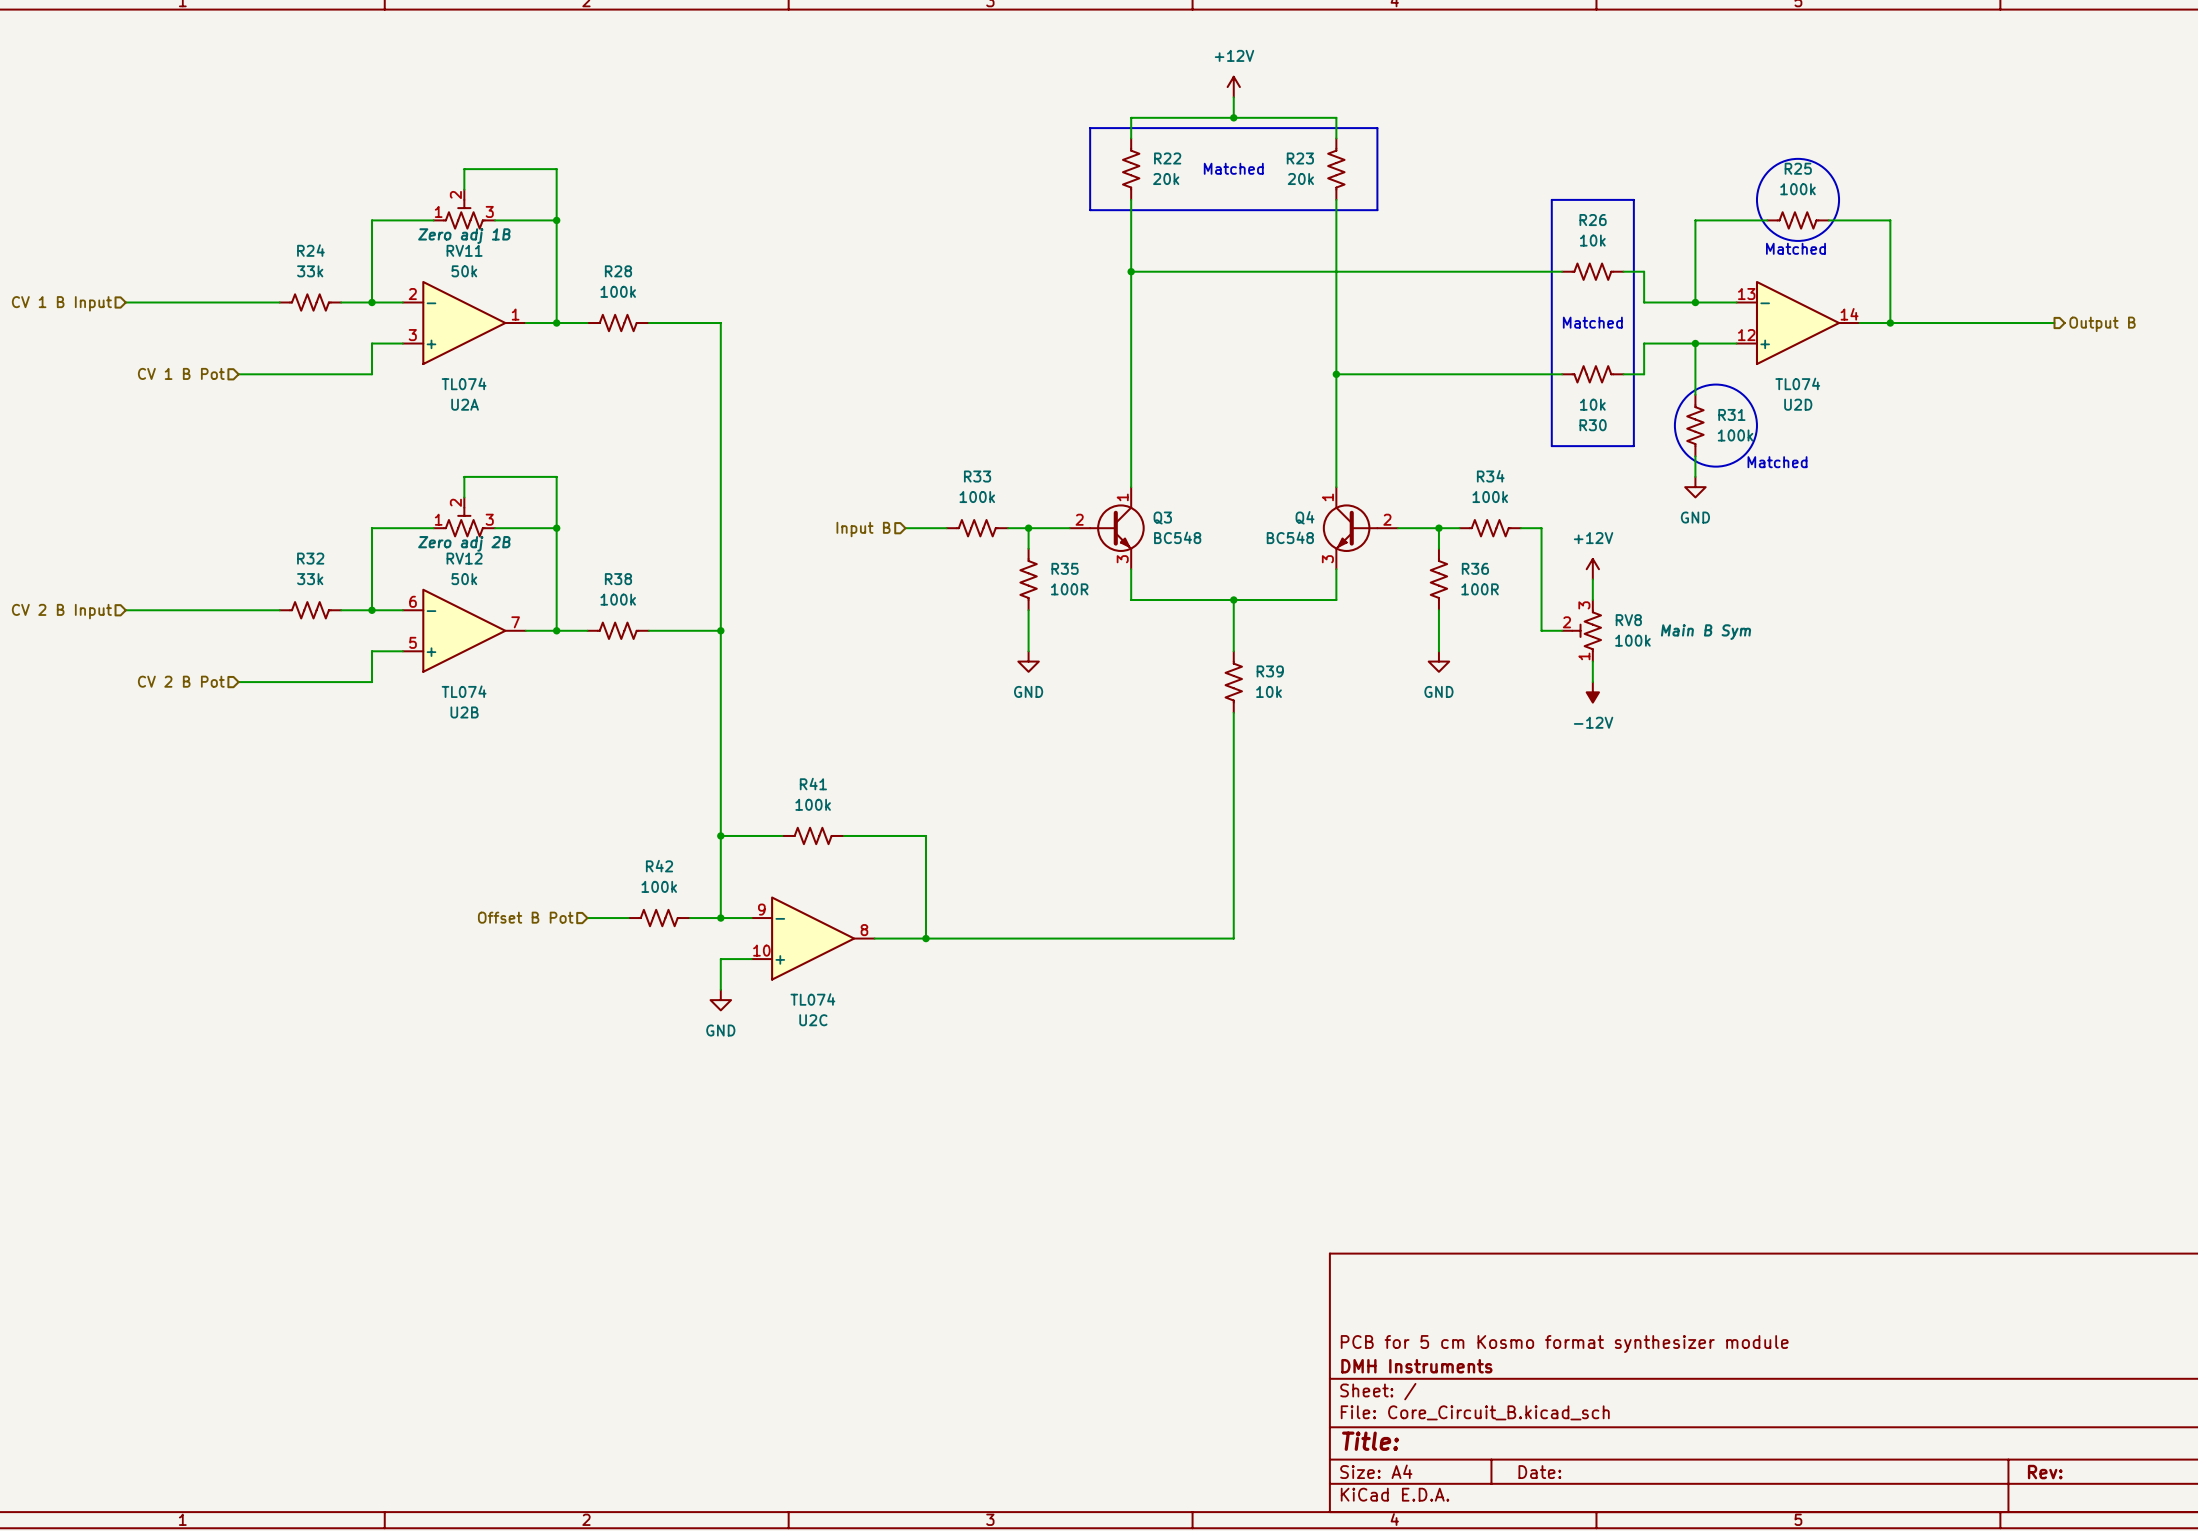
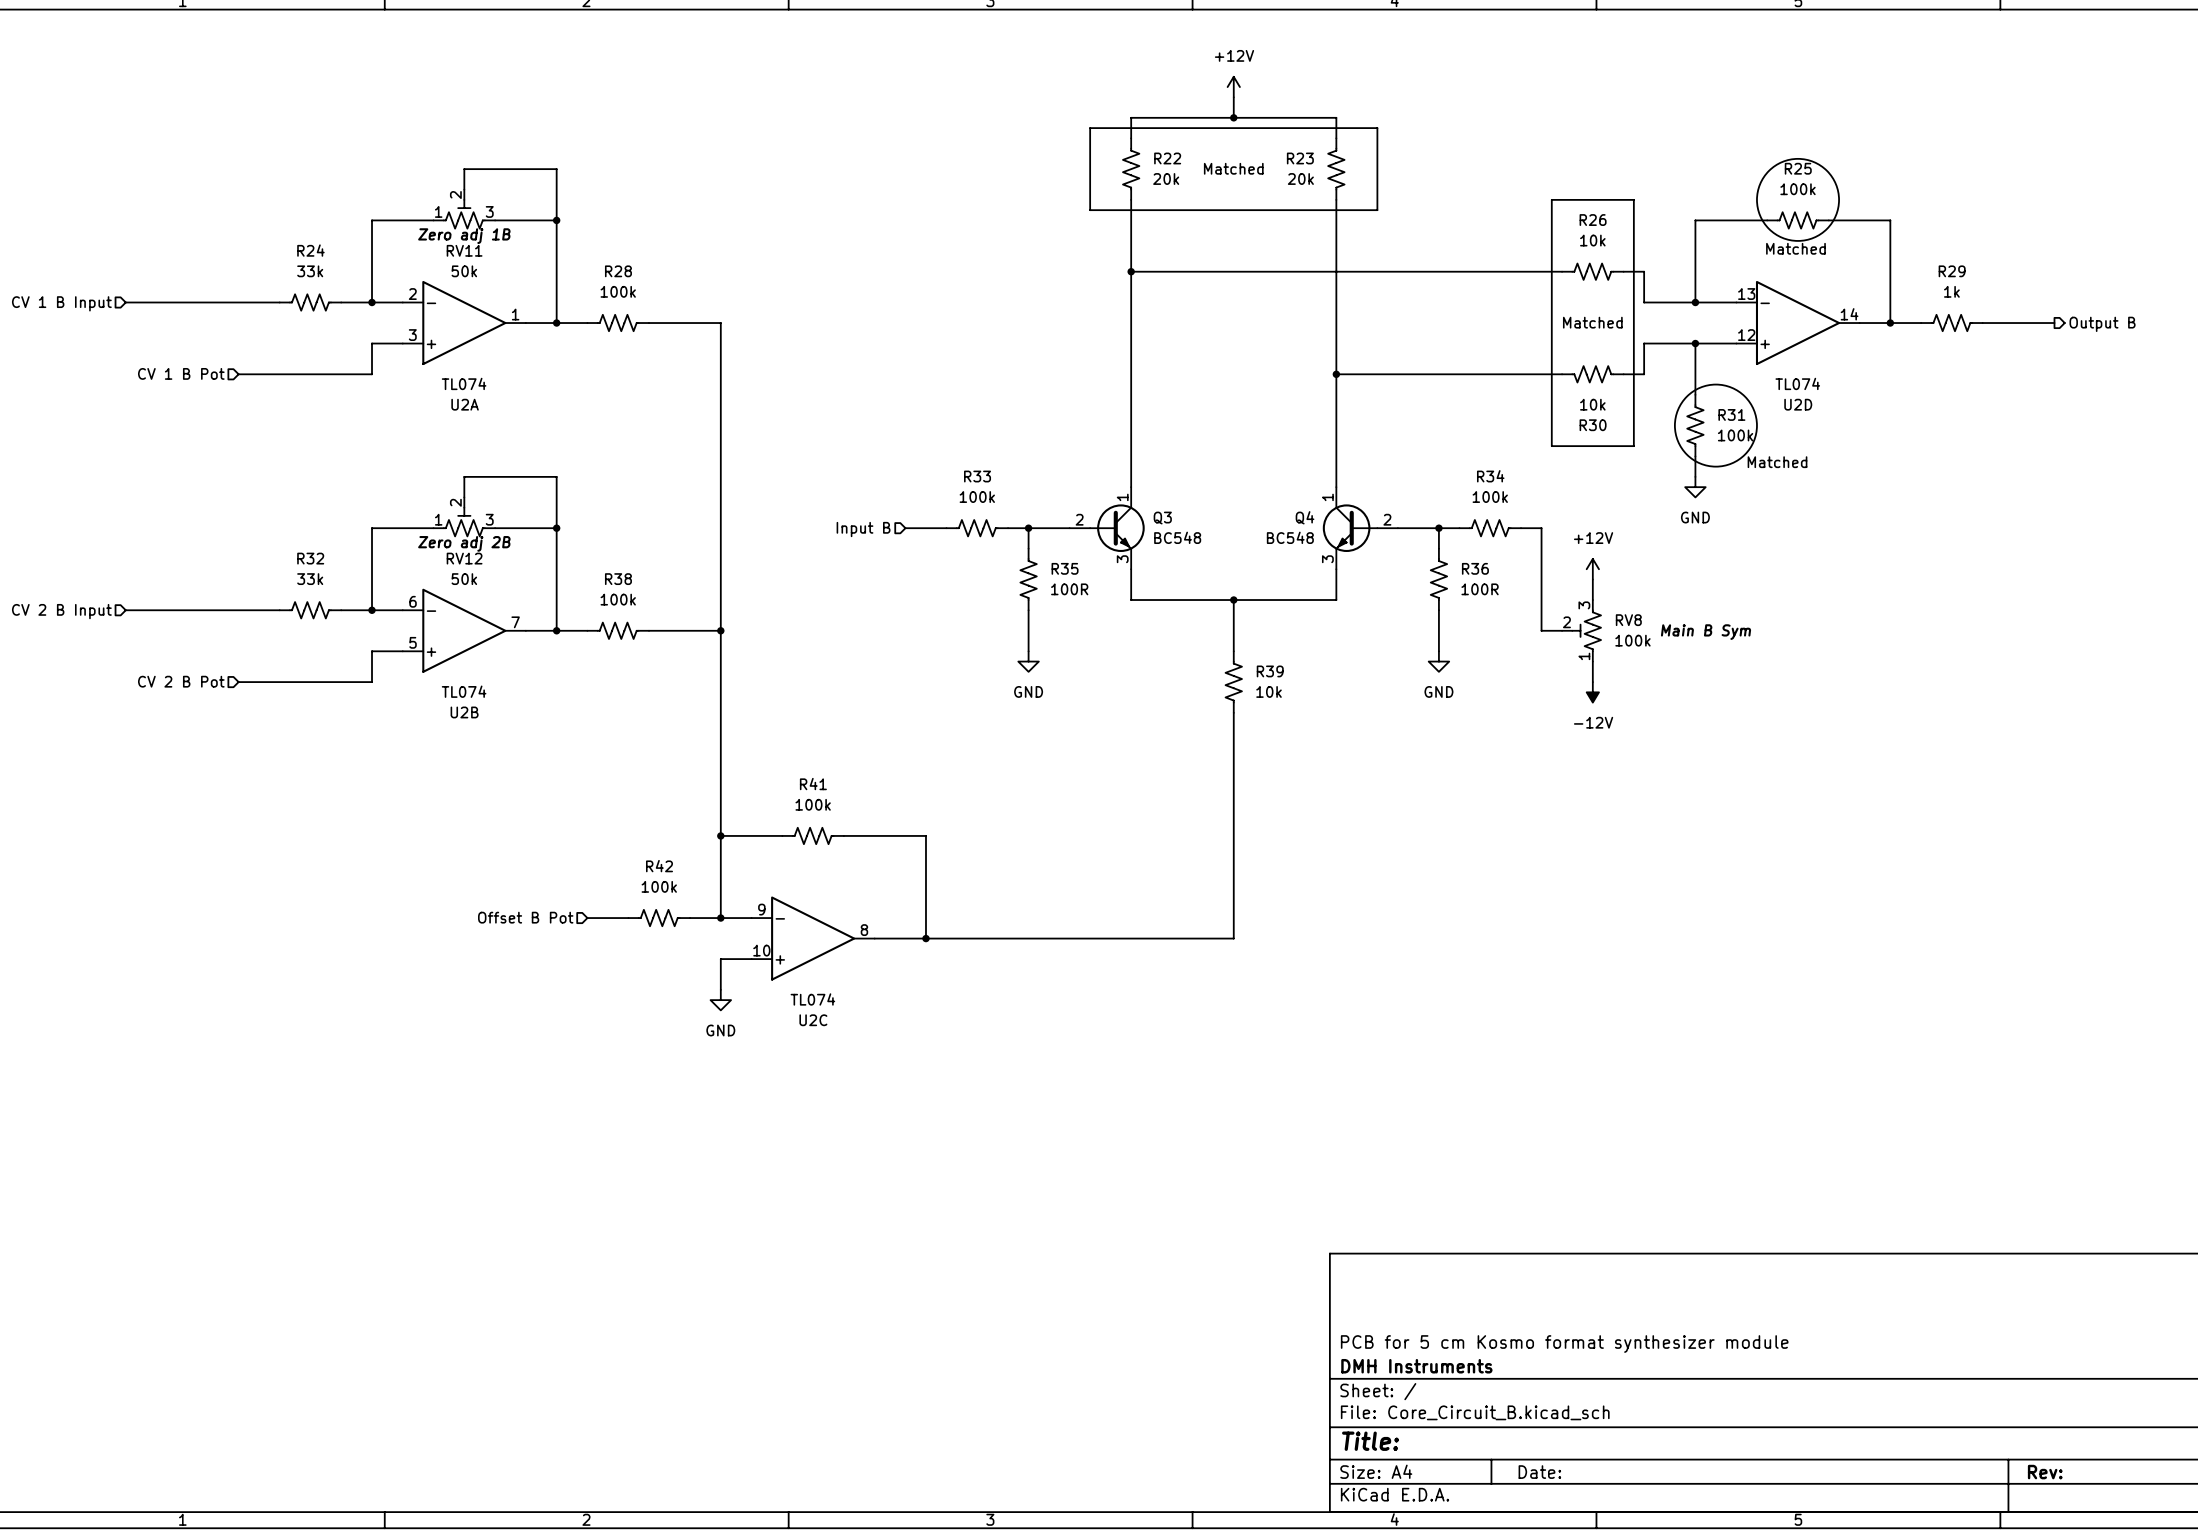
R29: none -> 1k (1951, 323)

